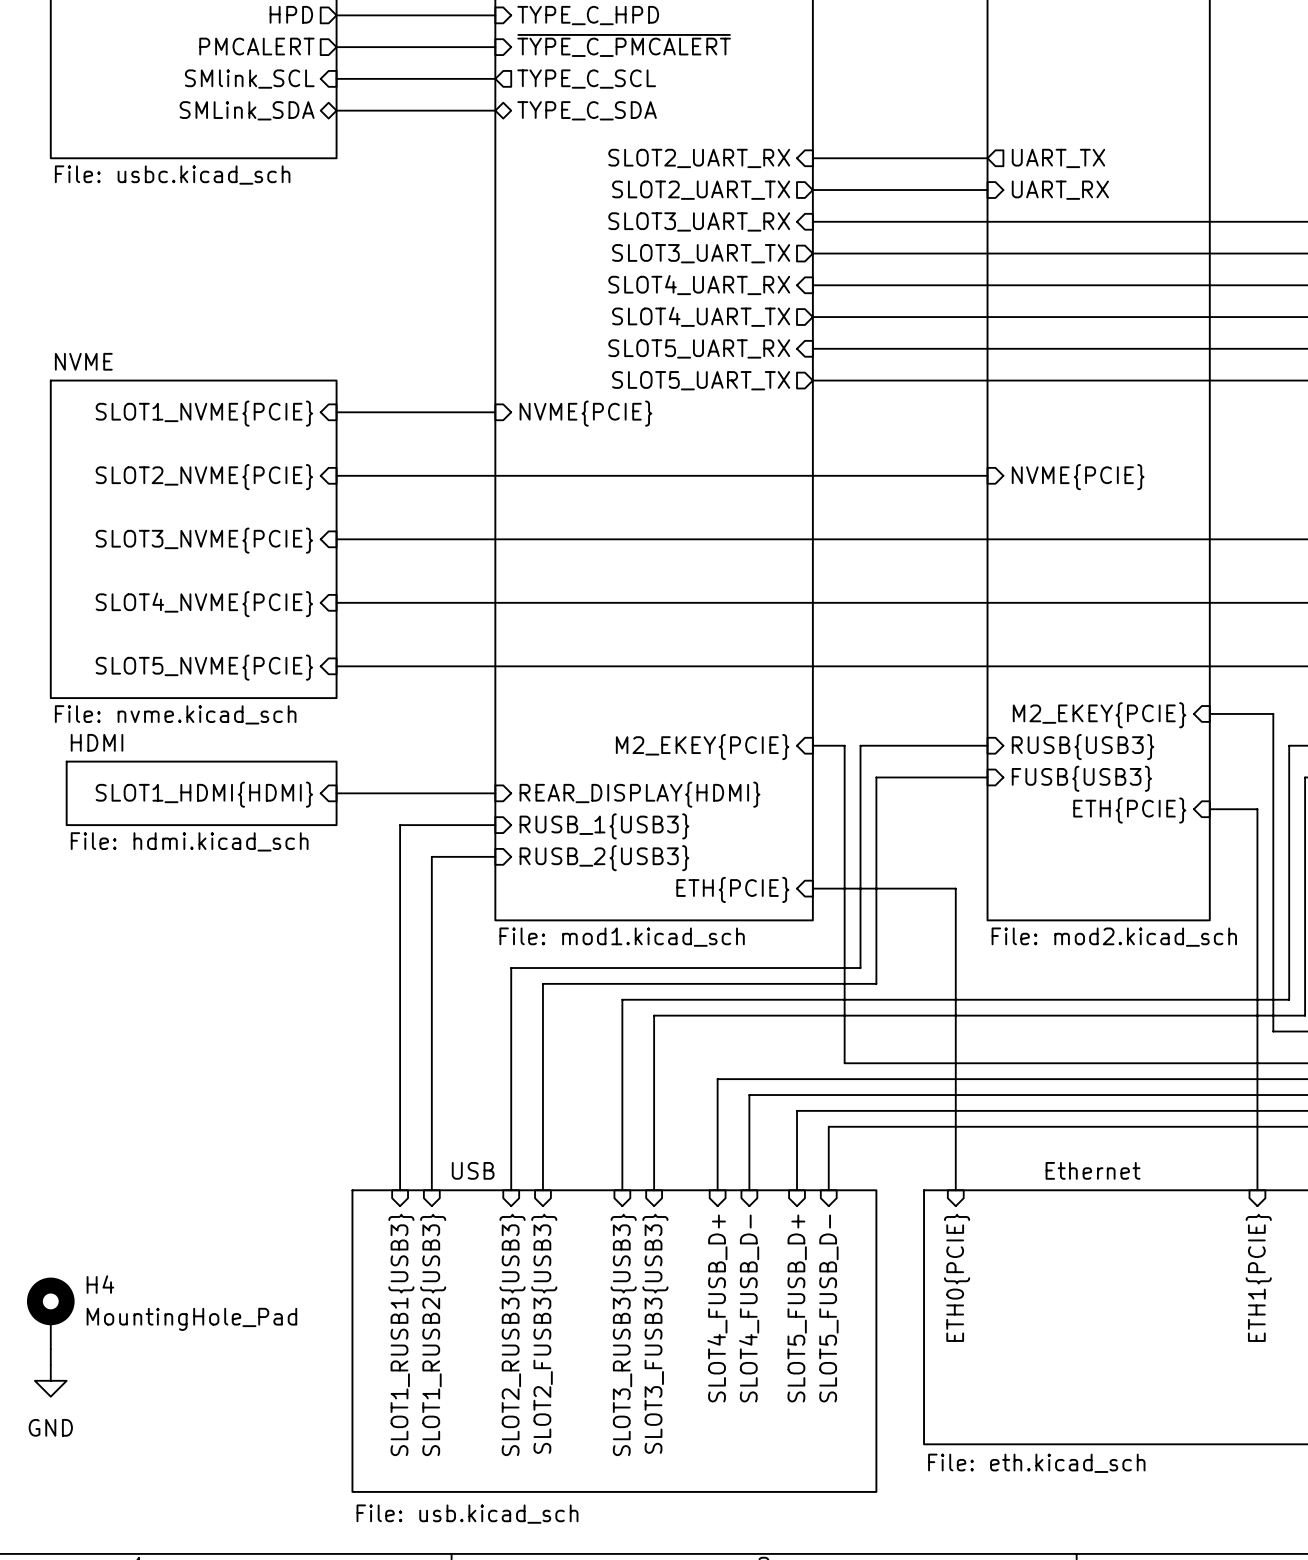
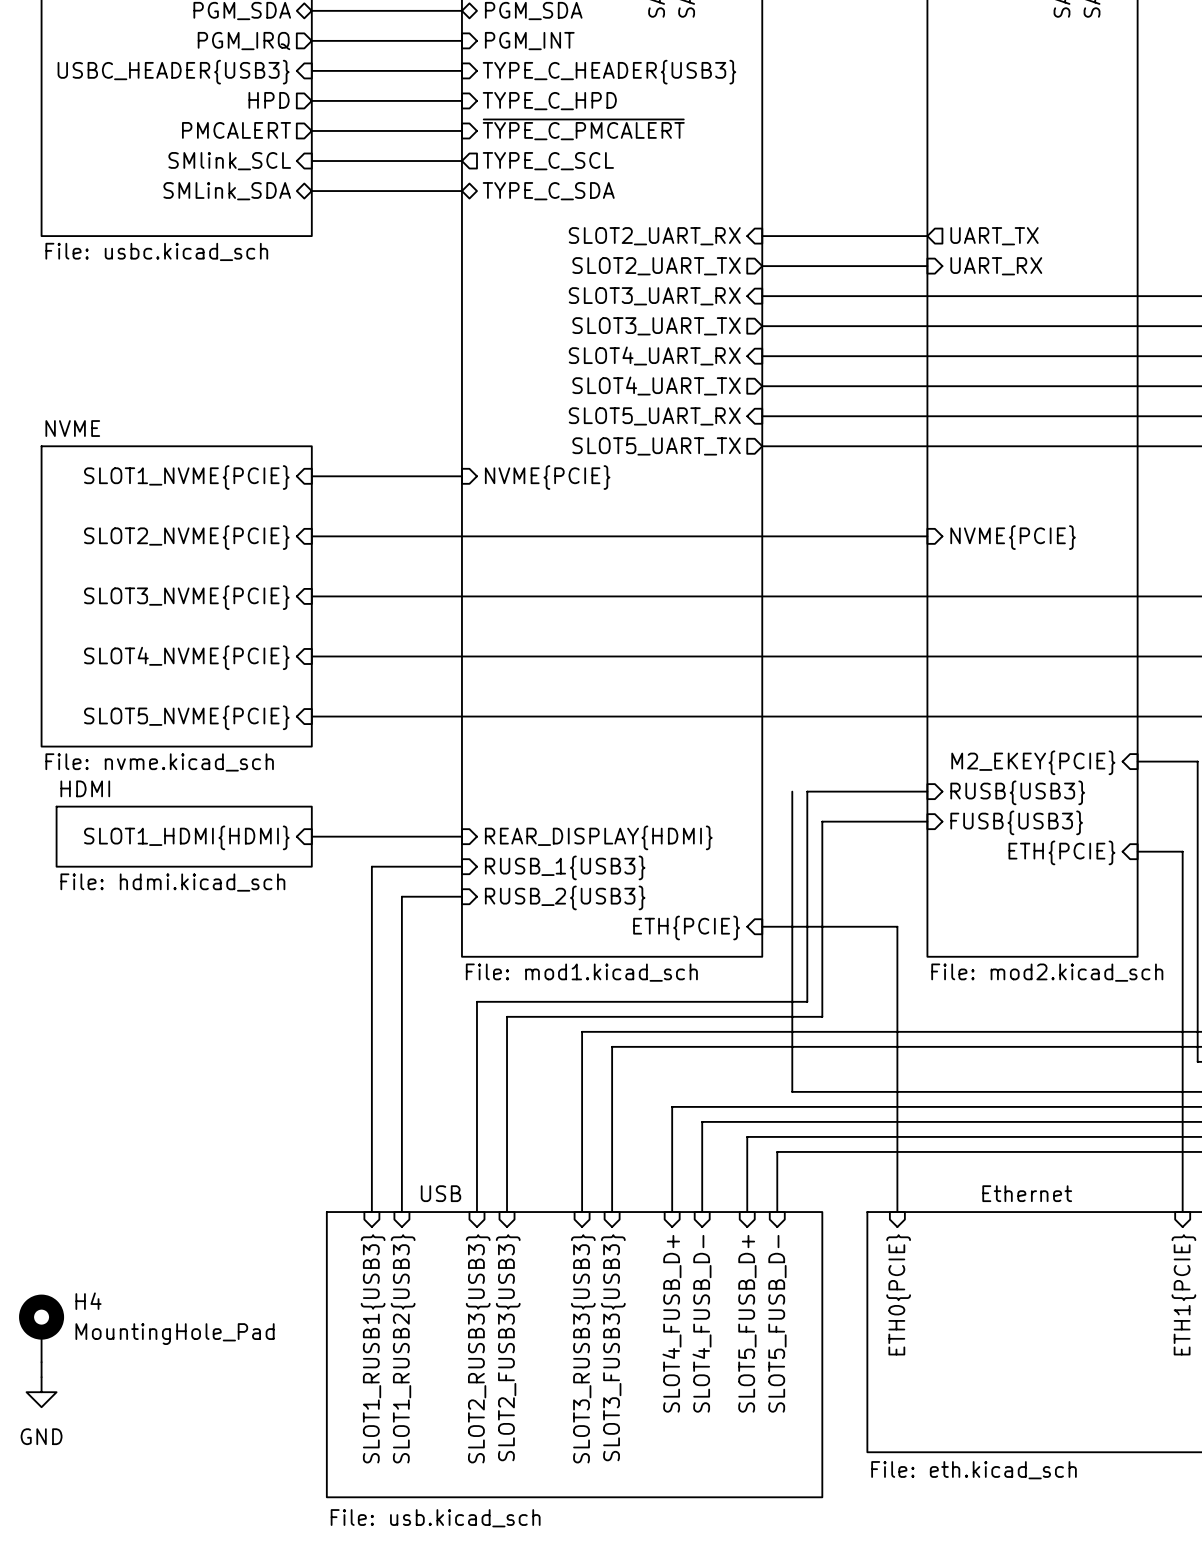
bus: (812, 745) (844, 745) -> none
sheet pin: M2_EKEY{PCIE} (702, 747) -> none

